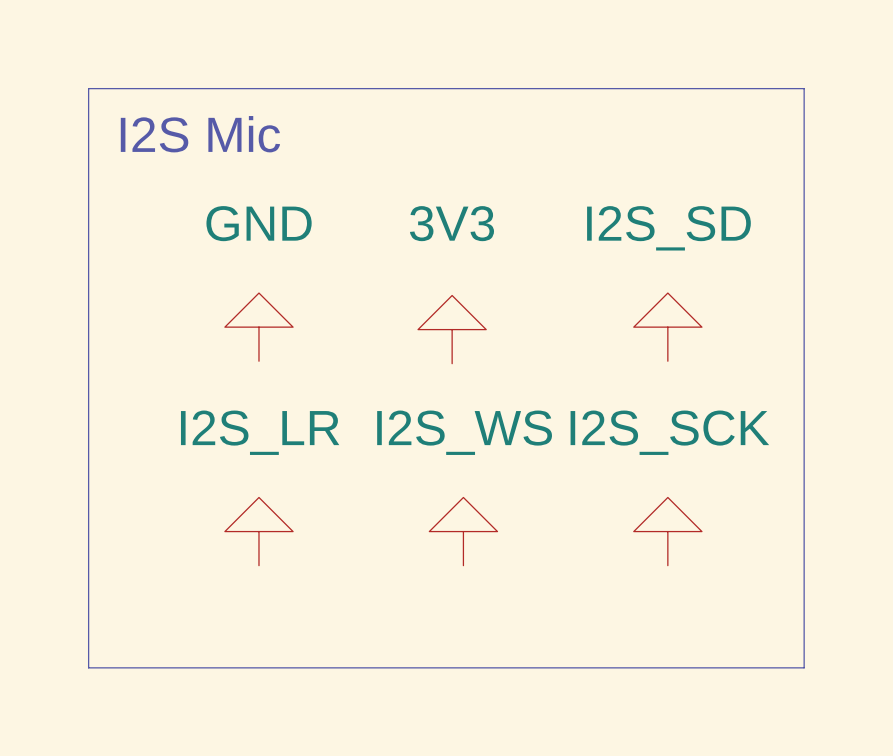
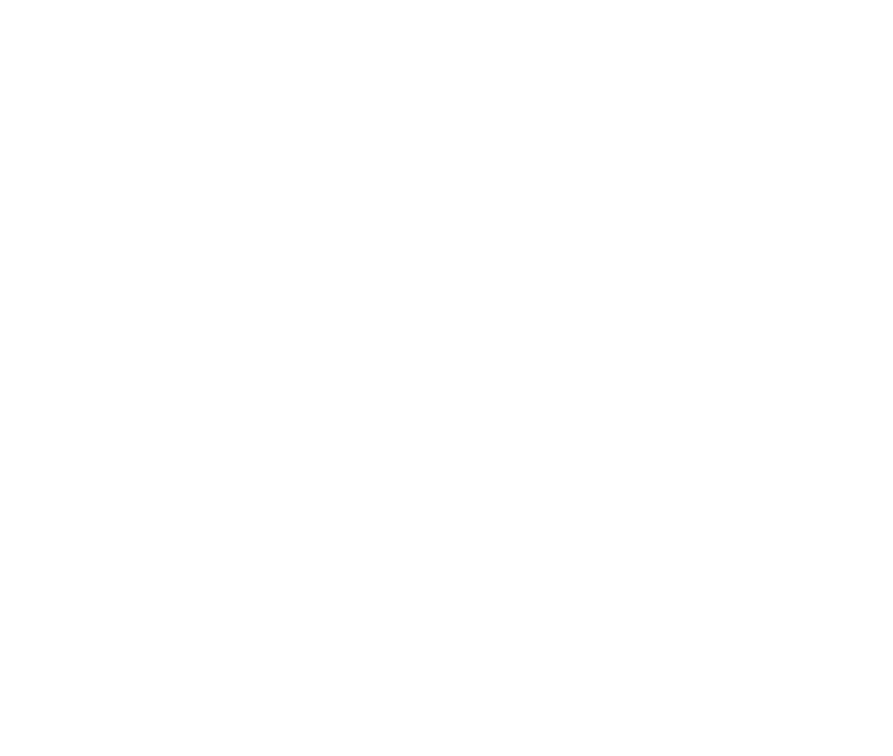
line: (88, 88) (804, 88) (804, 667) (88, 667) (88, 88) -> none
text: I2S Mic (200, 134) -> none
power symbol: GND (258, 327) -> none
power symbol: I2S_SD (667, 327) -> none
power symbol: 3V3 (452, 329) -> none
power symbol: I2S_LR (258, 531) -> none
power symbol: I2S_WS (463, 531) -> none
power symbol: I2S_SCK (667, 531) -> none

